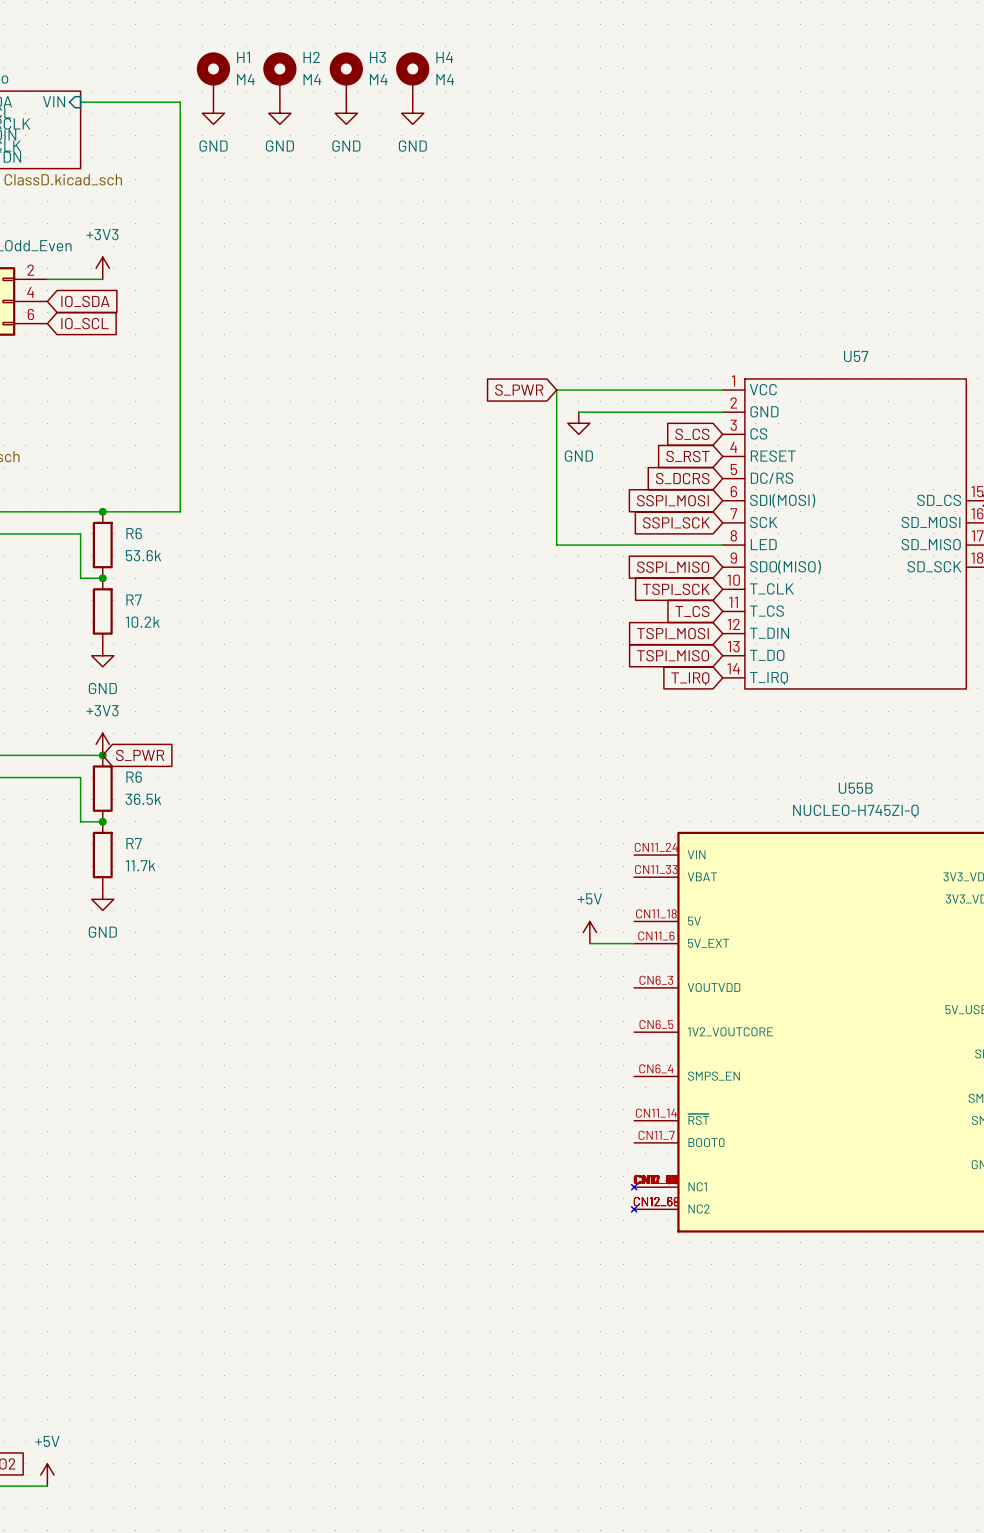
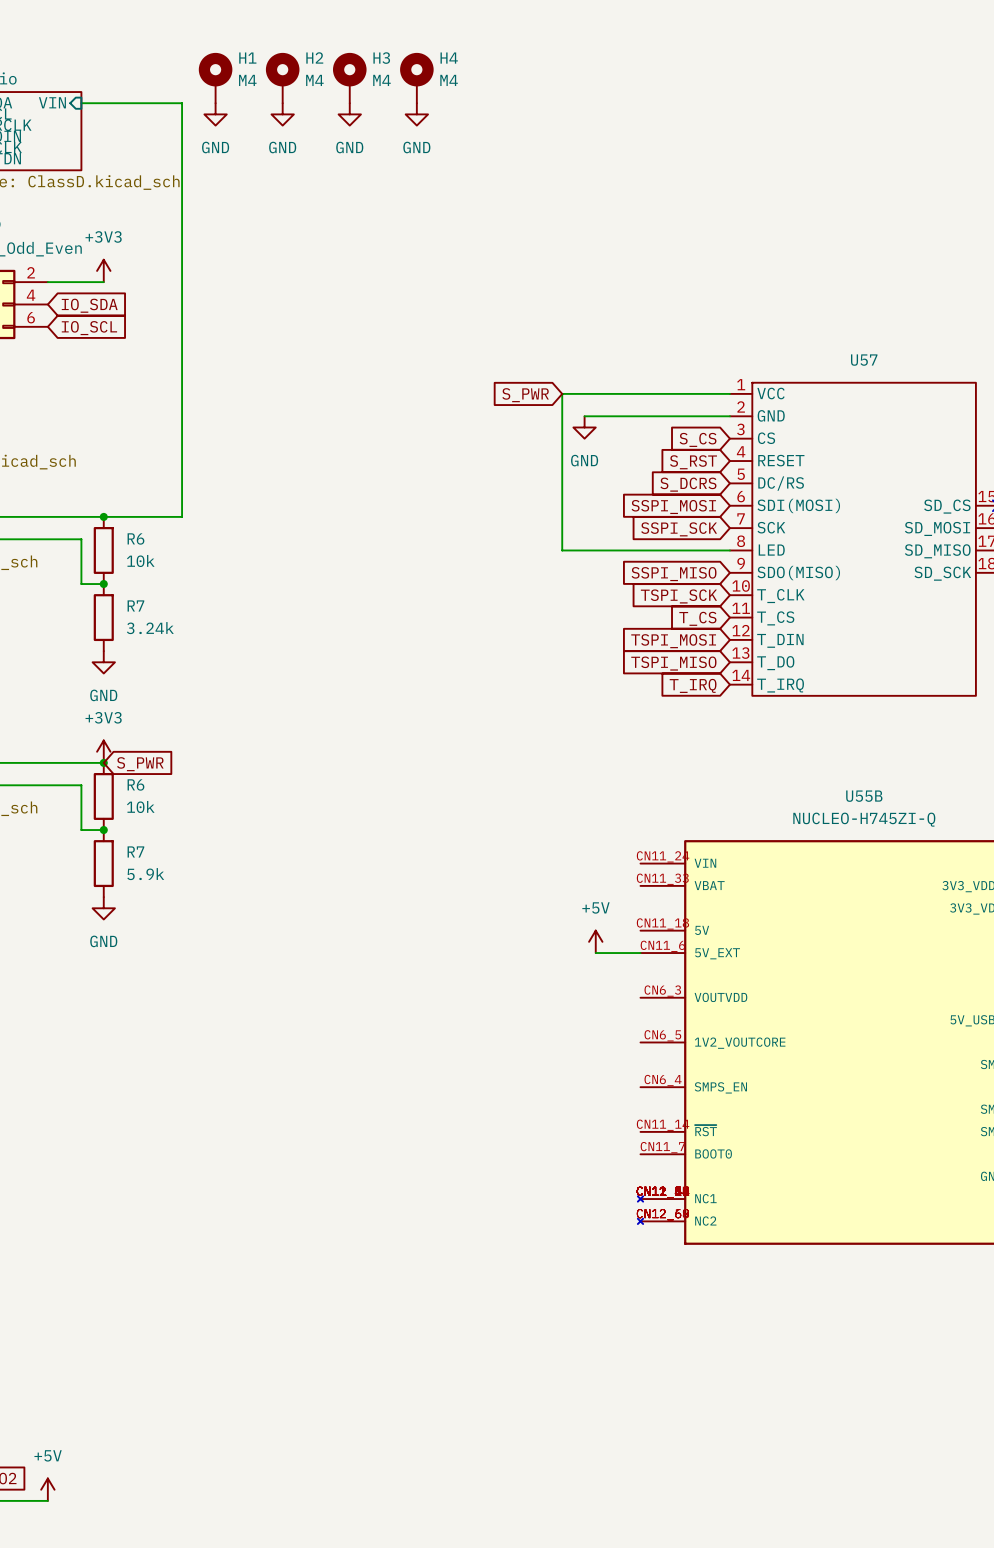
R6 value: 53.6k (143, 555) -> 10k (140, 561)
R7 value: 10.2k (142, 622) -> 3.24k (150, 628)
R6 value: 36.5k (143, 799) -> 10k (140, 807)
R7 value: 11.7k (140, 865) -> 5.9k (145, 874)

